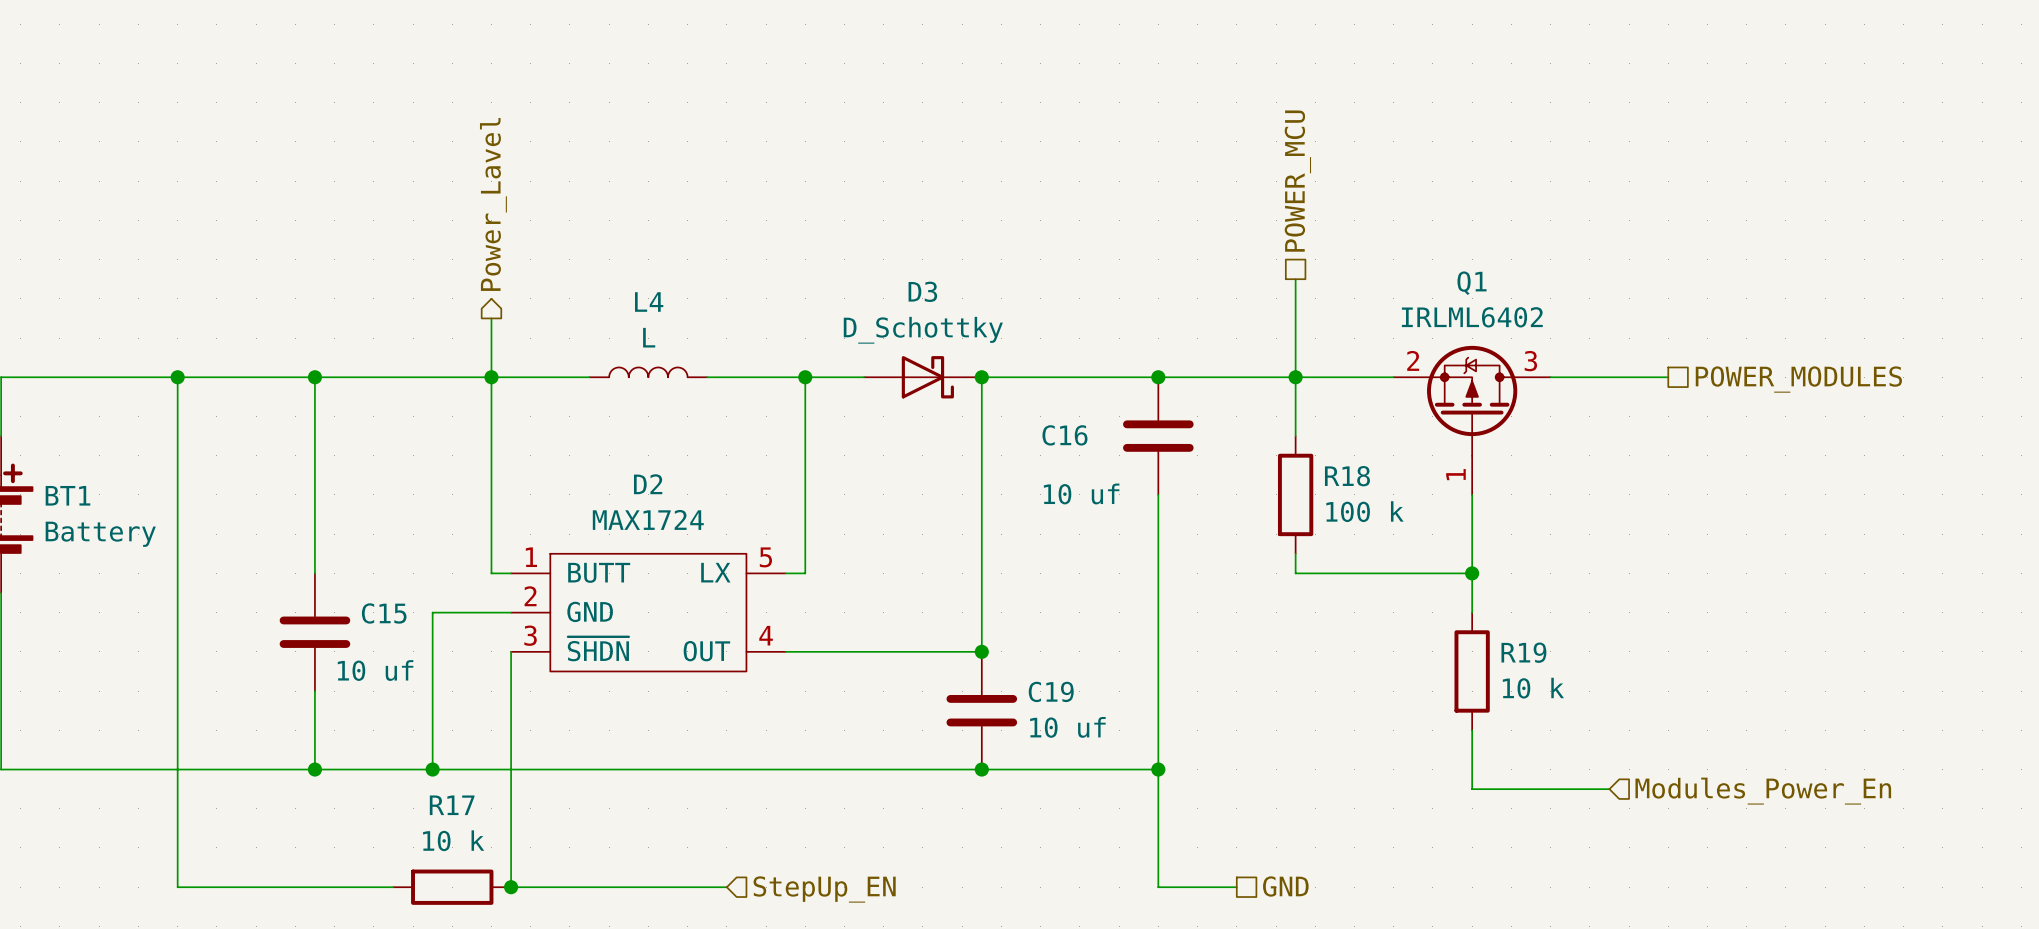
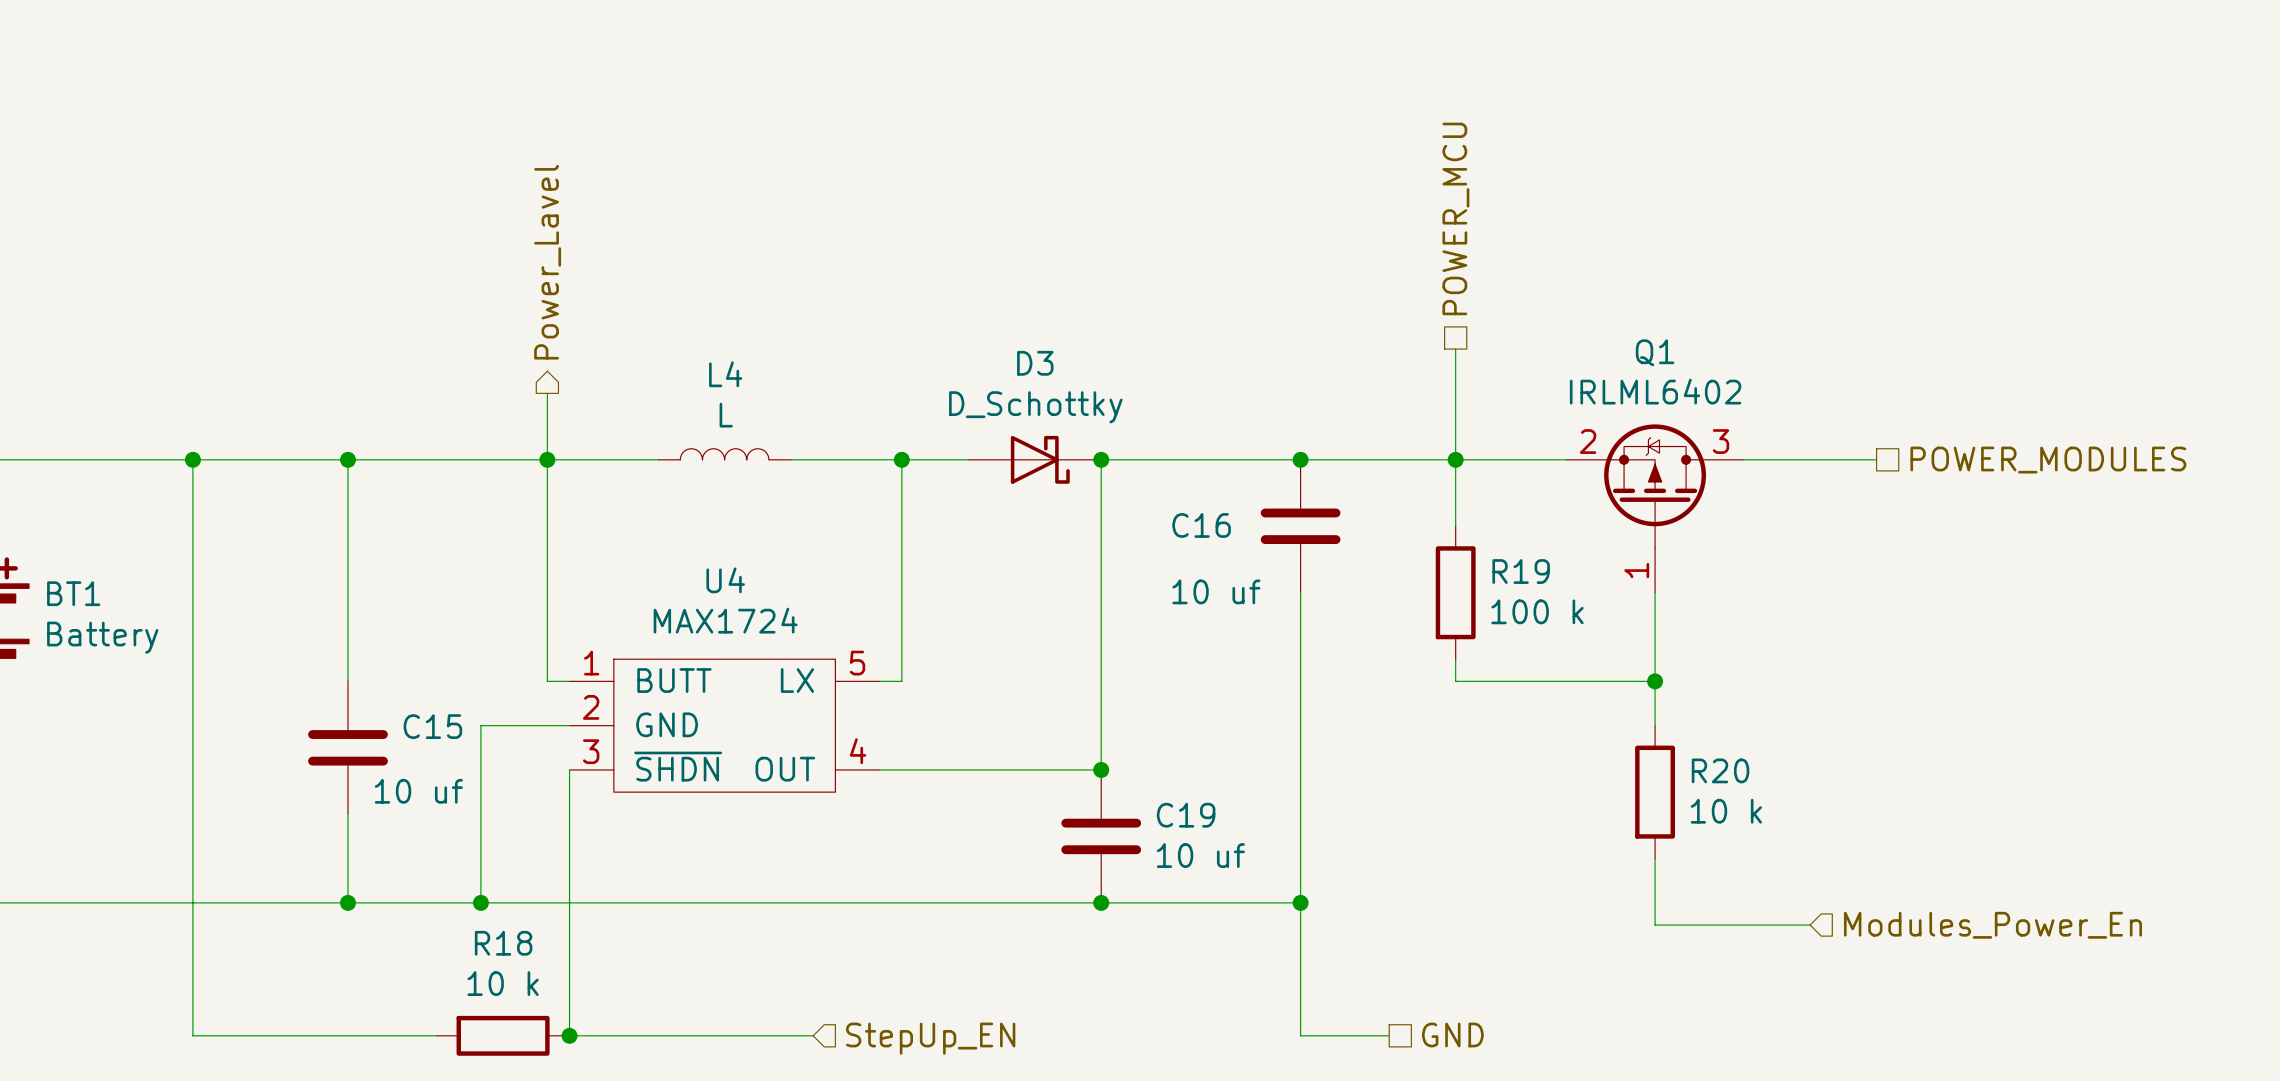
R18 name: R18 (1347, 476) -> R19 (1521, 571)
D2 name: D2 (648, 484) -> U4 (725, 580)
R19 name: R19 (1523, 652) -> R20 (1720, 770)
R17 name: R17 (452, 805) -> R18 (503, 943)

